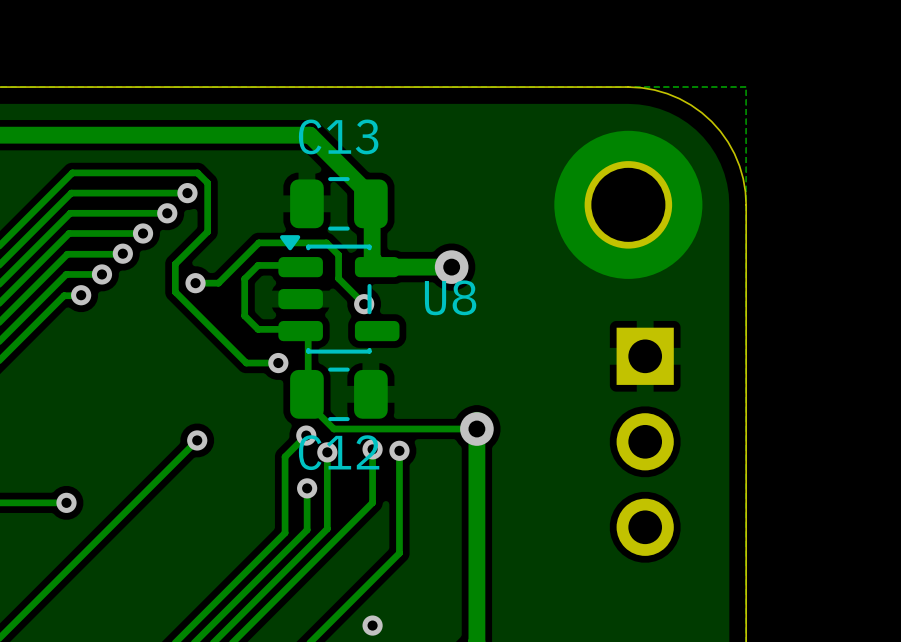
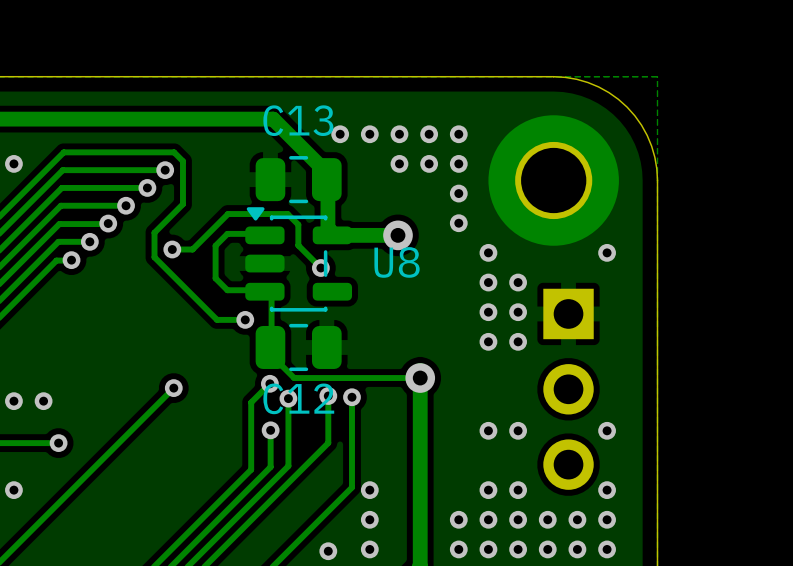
via: none -> (340, 134)
via: none -> (369, 134)
via: none -> (399, 134)
via: none -> (429, 134)
via: none -> (458, 134)
via: none -> (13, 163)
via: none -> (399, 163)
via: none -> (429, 163)
via: none -> (458, 163)
via: none -> (458, 193)
via: none -> (458, 223)
via: none -> (488, 252)
via: none -> (607, 252)
via: none -> (488, 282)
via: none -> (518, 282)
via: none -> (488, 312)
via: none -> (518, 312)
via: none -> (488, 341)
via: none -> (518, 341)
via: none -> (13, 401)
via: none -> (43, 401)
via: none -> (488, 430)
via: none -> (518, 430)
via: none -> (607, 430)
via: none -> (13, 490)
via: none -> (369, 490)
via: none -> (488, 490)
via: none -> (518, 490)
via: none -> (607, 490)
via: none -> (369, 519)
via: none -> (458, 519)
via: none -> (488, 519)
via: none -> (518, 519)
via: none -> (547, 519)
via: none -> (577, 519)
via: none -> (607, 519)
via: none -> (369, 549)
via: none -> (458, 549)
via: none -> (488, 549)
via: none -> (518, 549)
via: none -> (547, 549)
via: none -> (577, 549)
via: none -> (607, 549)

